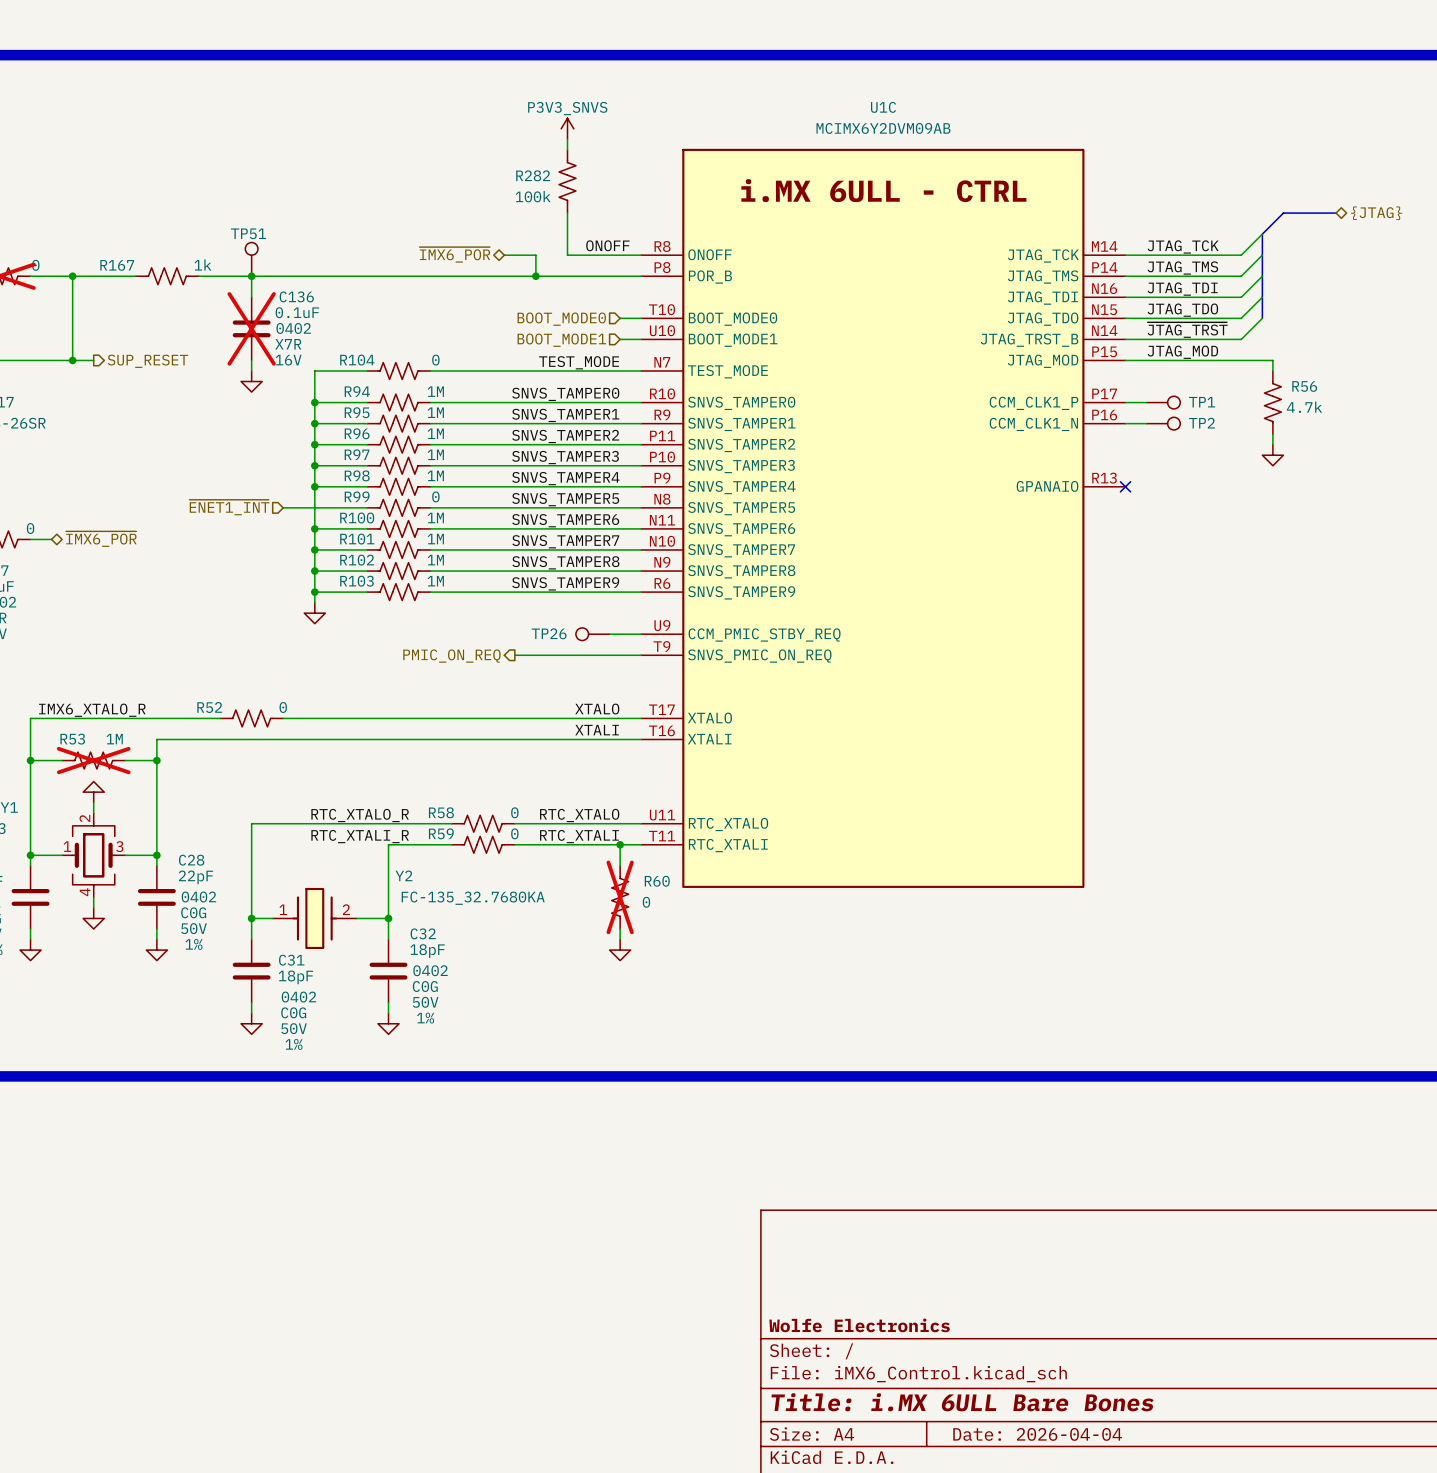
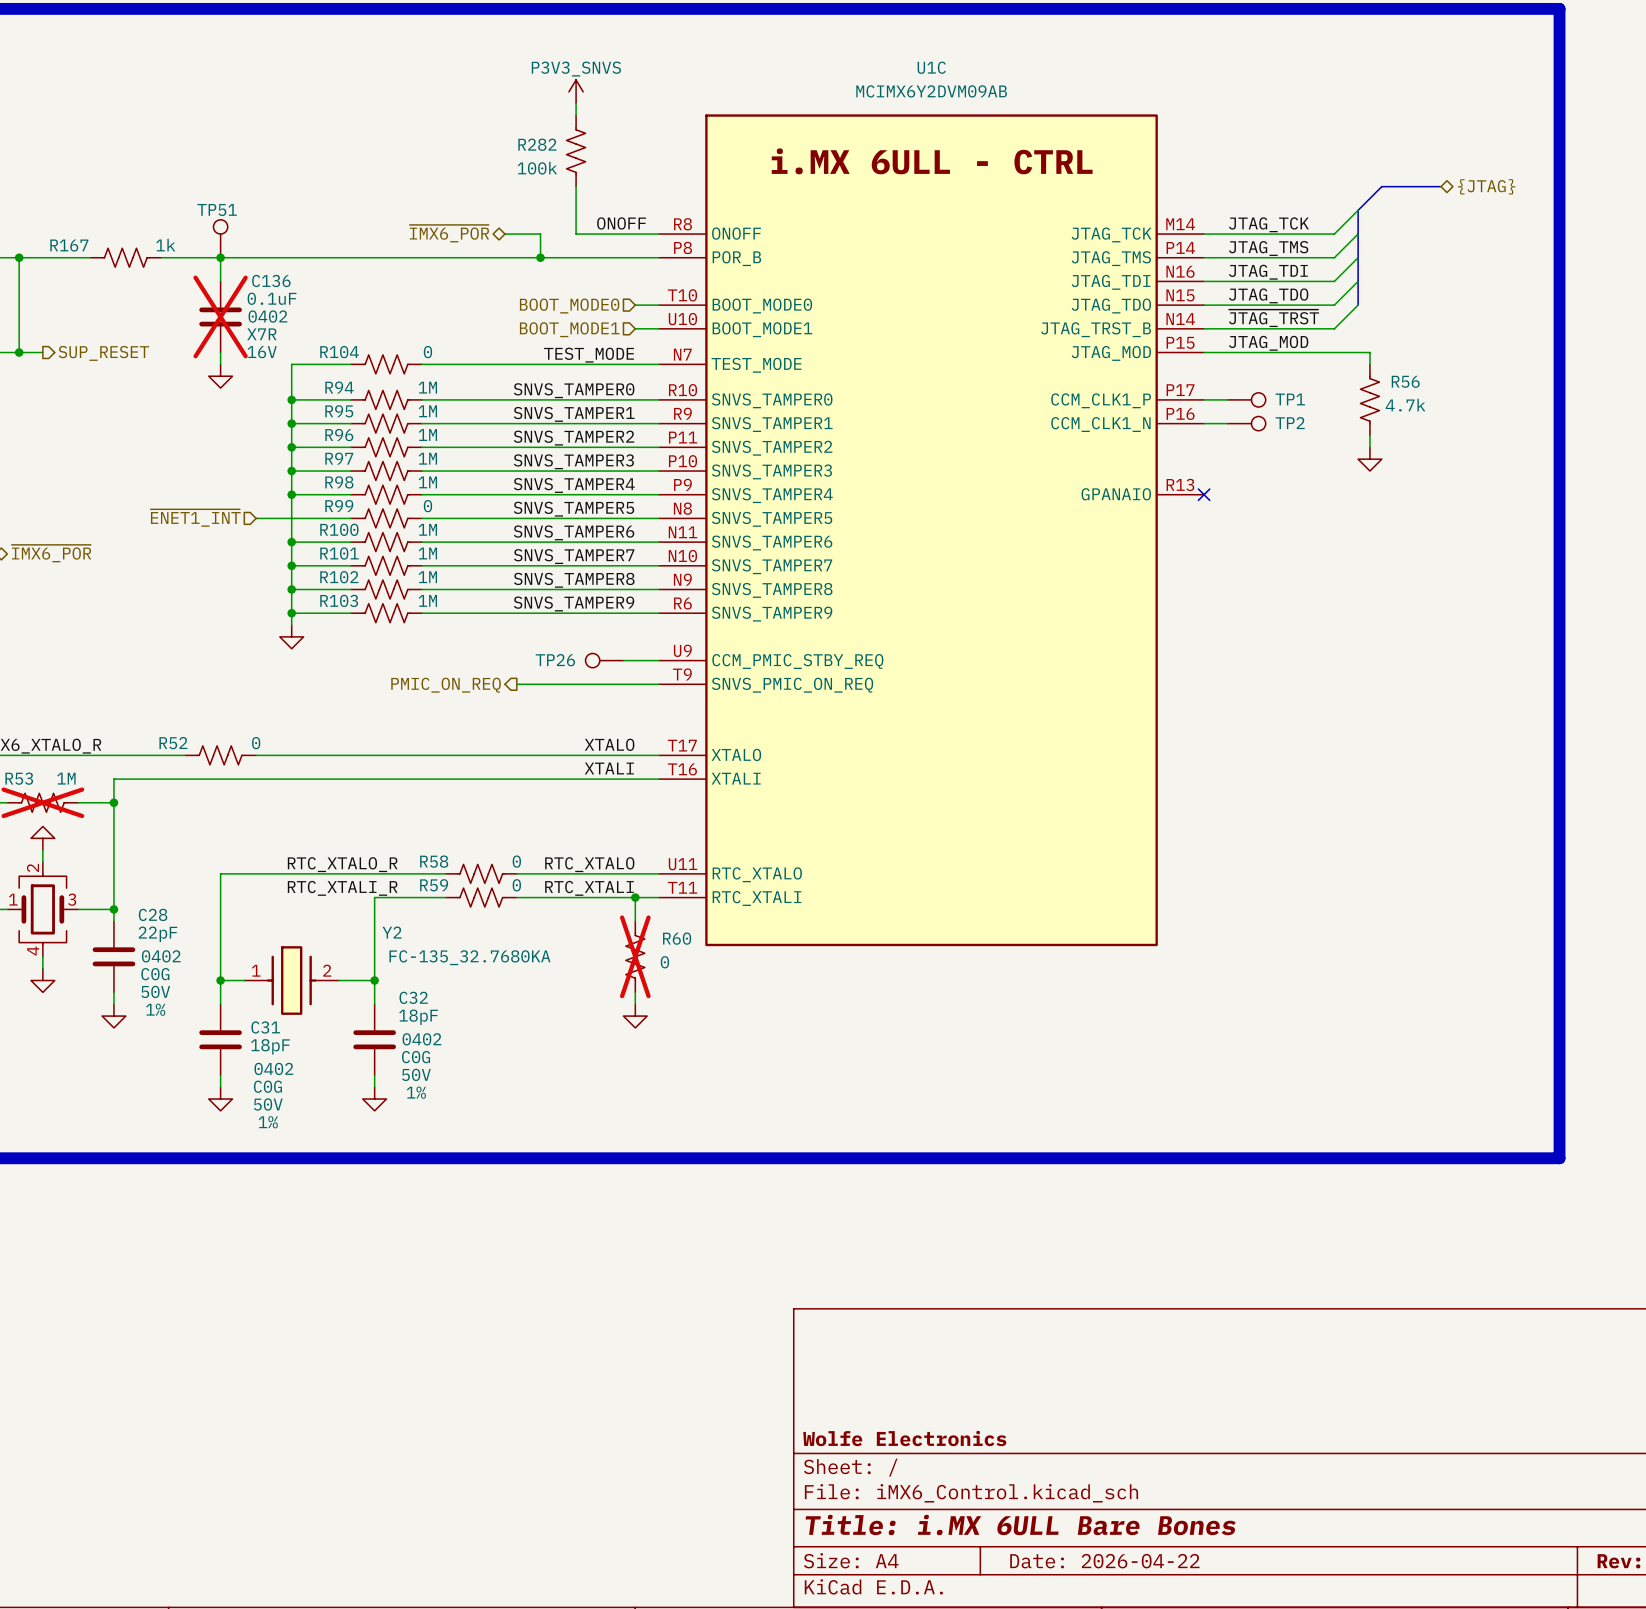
title block: Date: 2026-04-04 (1037, 1434) -> Date: 2026-04-22 (1104, 1561)

